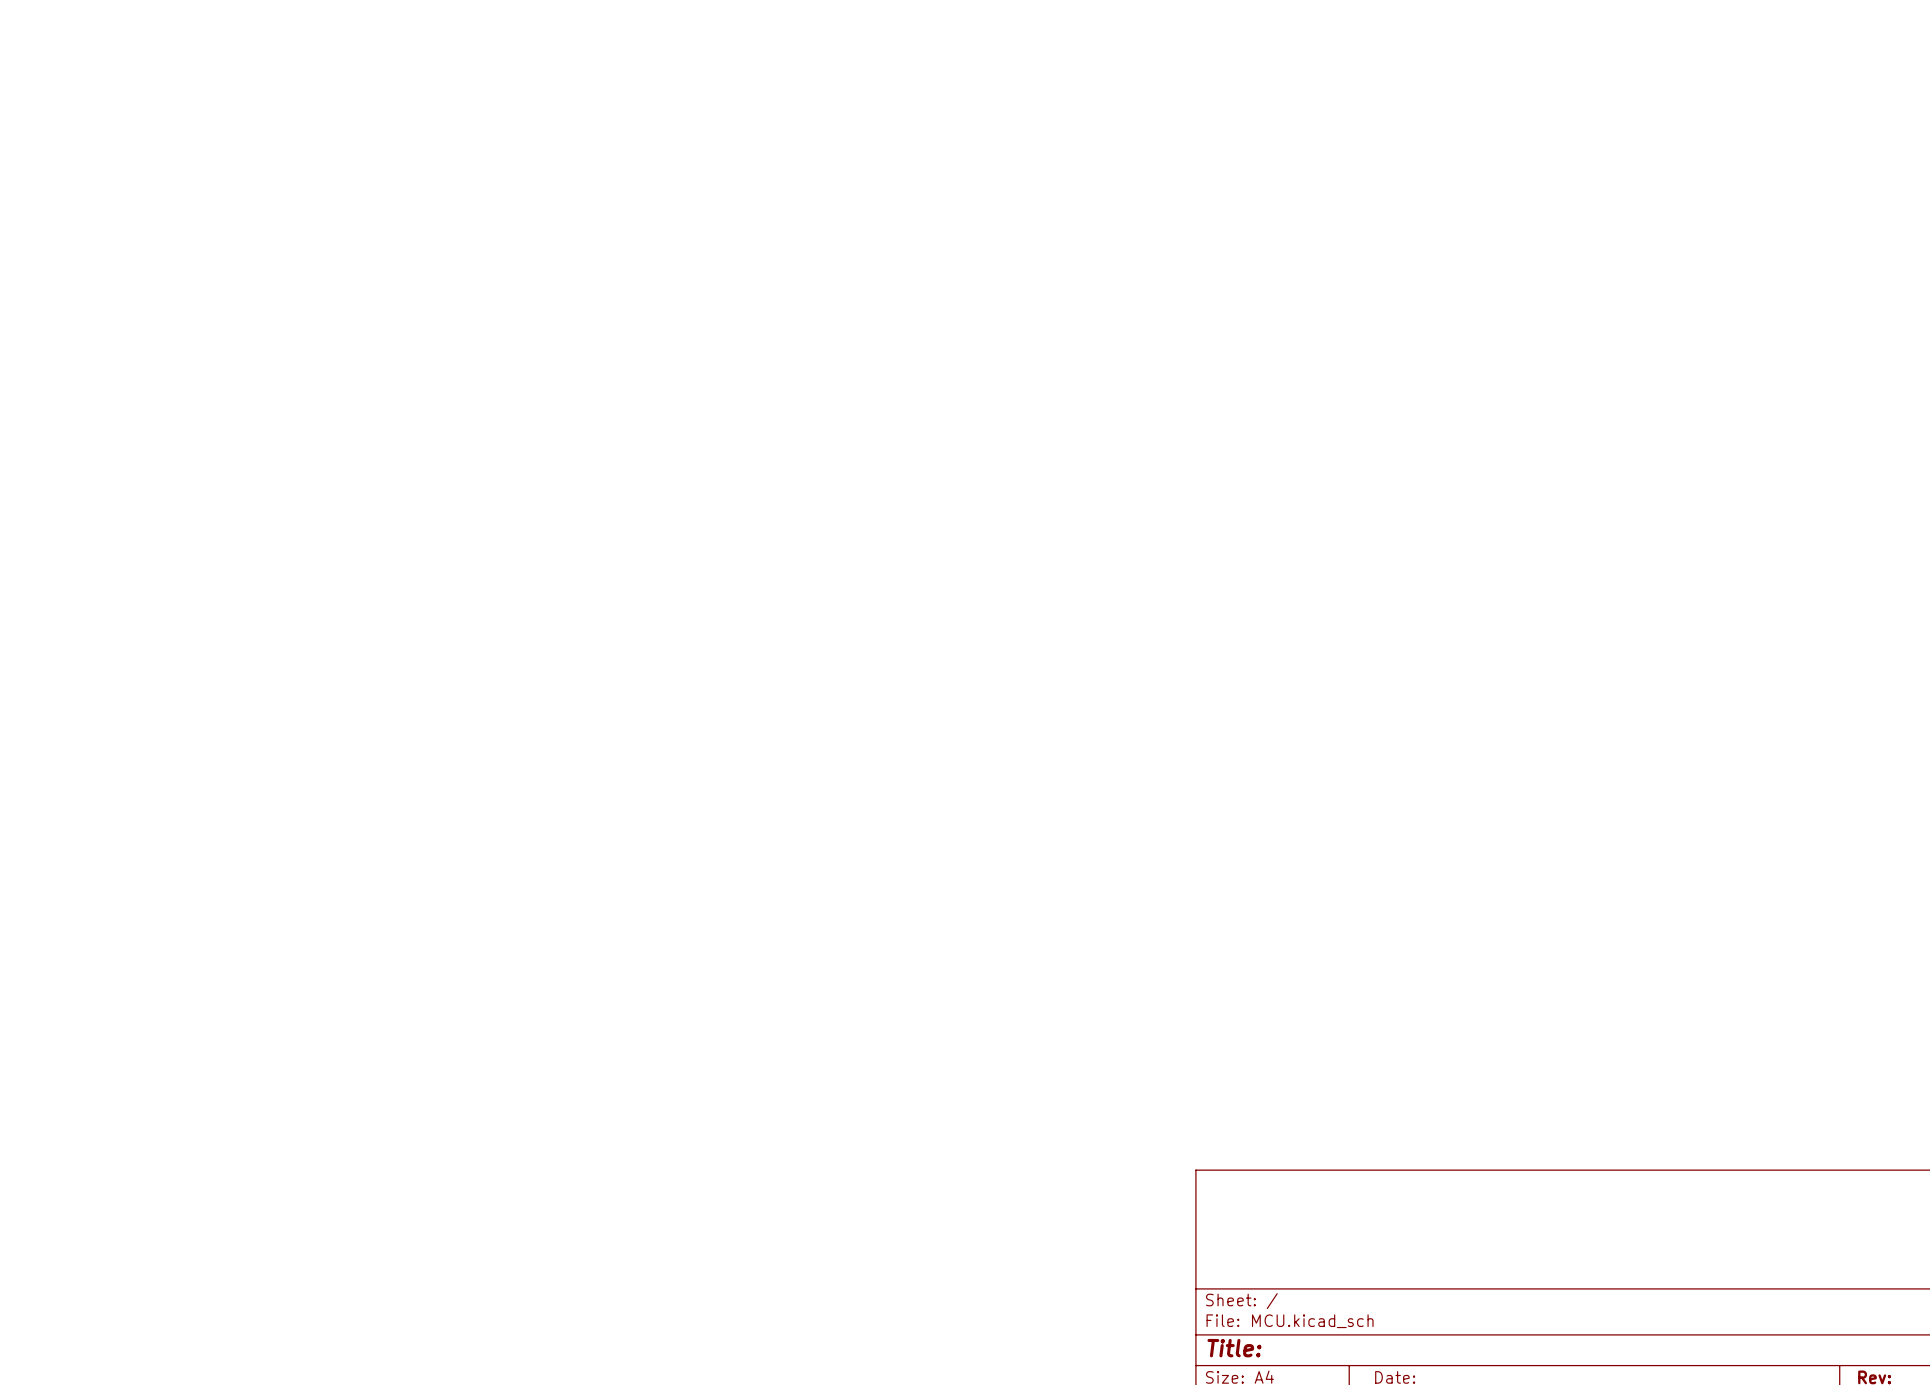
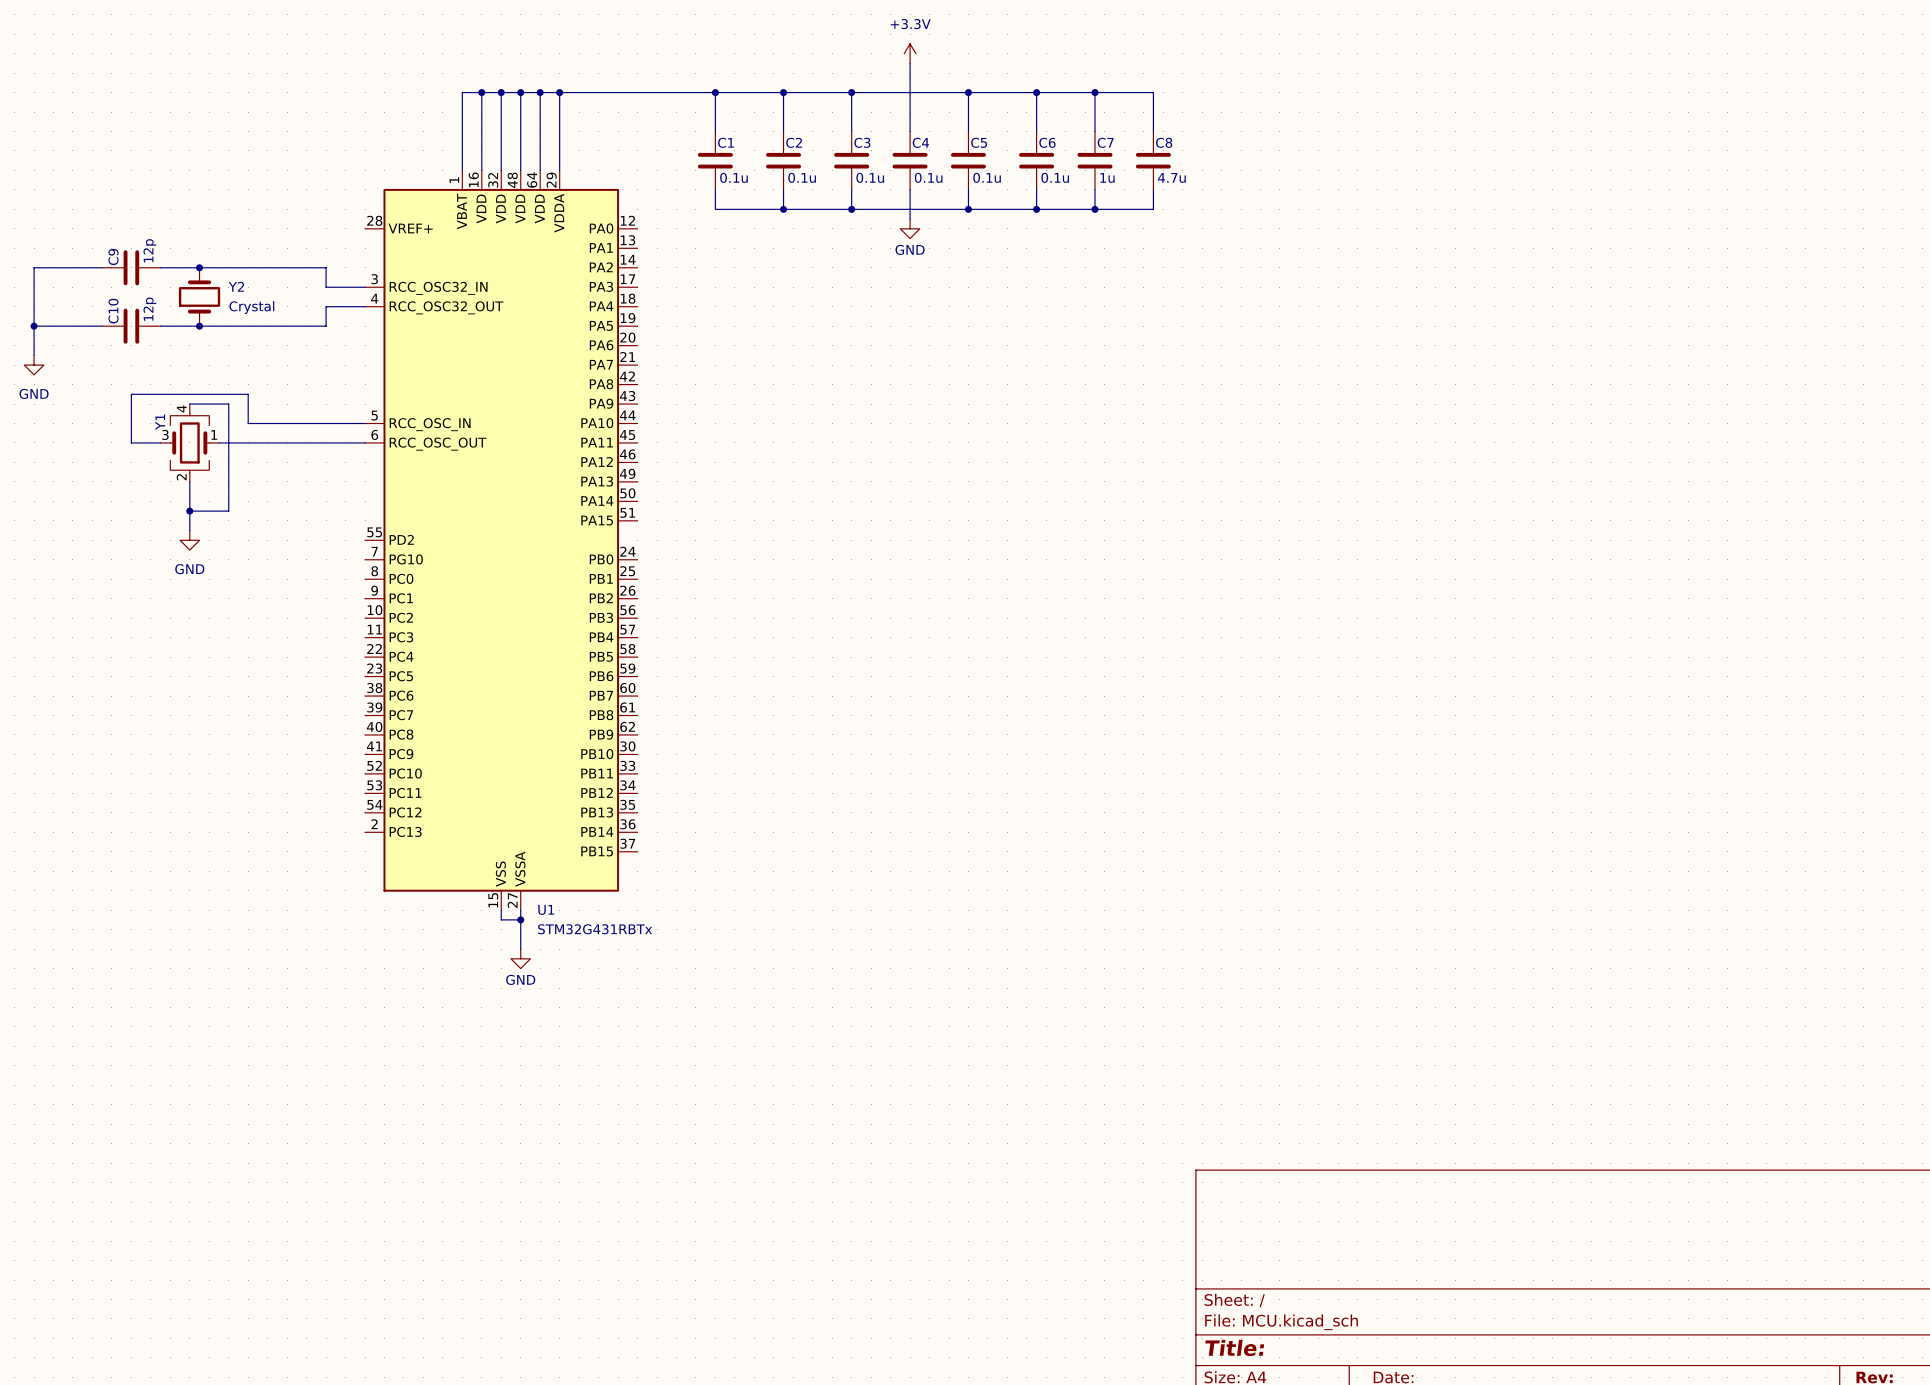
power symbol: none -> +3.3V (910, 53)
wire: none -> (910, 63) (910, 131)
wire: none -> (481, 92) (481, 170)
junction: none -> (481, 92)
wire: none -> (501, 92) (501, 170)
junction: none -> (501, 92)
wire: none -> (520, 92) (520, 170)
junction: none -> (520, 92)
wire: none -> (540, 92) (540, 170)
junction: none -> (540, 92)
wire: none -> (559, 92) (559, 170)
junction: none -> (559, 92)
wire: none -> (715, 92) (715, 131)
junction: none -> (715, 92)
wire: none -> (783, 92) (783, 131)
junction: none -> (783, 92)
wire: none -> (851, 92) (851, 131)
junction: none -> (851, 92)
wire: none -> (968, 92) (968, 131)
junction: none -> (968, 92)
wire: none -> (1036, 92) (1036, 131)
junction: none -> (1036, 92)
wire: none -> (1095, 92) (1095, 131)
junction: none -> (1095, 92)
wire: none -> (1153, 131) (1153, 92) (462, 92) (462, 170)
C1: none -> 0.1u (715, 160)
C2: none -> 0.1u (783, 160)
C3: none -> 0.1u (851, 160)
C4: none -> 0.1u (910, 160)
C5: none -> 0.1u (968, 160)
C6: none -> 0.1u (1036, 160)
C7: none -> 1u (1095, 160)
C8: none -> 4.7u (1153, 160)
wire: none -> (715, 189) (715, 209) (1153, 209) (1153, 189)
wire: none -> (783, 189) (783, 209)
wire: none -> (851, 189) (851, 209)
wire: none -> (910, 189) (910, 219)
wire: none -> (968, 189) (968, 209)
wire: none -> (1036, 189) (1036, 209)
wire: none -> (1095, 189) (1095, 209)
junction: none -> (783, 209)
junction: none -> (851, 209)
junction: none -> (968, 209)
junction: none -> (1036, 209)
junction: none -> (1095, 209)
power symbol: none -> GND (910, 228)
wire: none -> (102, 267) (34, 267) (34, 355)
C9: none -> 12p (131, 267)
wire: none -> (160, 267) (326, 267) (326, 287) (365, 287)
junction: none -> (199, 267)
Y2: none -> Crystal (199, 296)
wire: none -> (365, 306) (326, 306) (326, 326) (160, 326)
wire: none -> (34, 326) (102, 326)
junction: none -> (34, 326)
C10: none -> 12p (131, 326)
junction: none -> (199, 326)
power symbol: none -> GND (34, 365)
wire: none -> (189, 404) (228, 404) (228, 511) (189, 511)
wire: none -> (365, 423) (248, 423) (248, 394) (131, 394) (131, 442) (160, 442)
Y1: none -> (189, 442)
wire: none -> (219, 442) (365, 442)
wire: none -> (189, 481) (189, 530)
junction: none -> (189, 511)
power symbol: none -> GND (189, 540)
U1: none -> STM32G431RBTx (501, 540)
wire: none -> (501, 910) (501, 919) (520, 919)
wire: none -> (520, 910) (520, 949)
junction: none -> (520, 919)
power symbol: none -> GND (520, 958)

